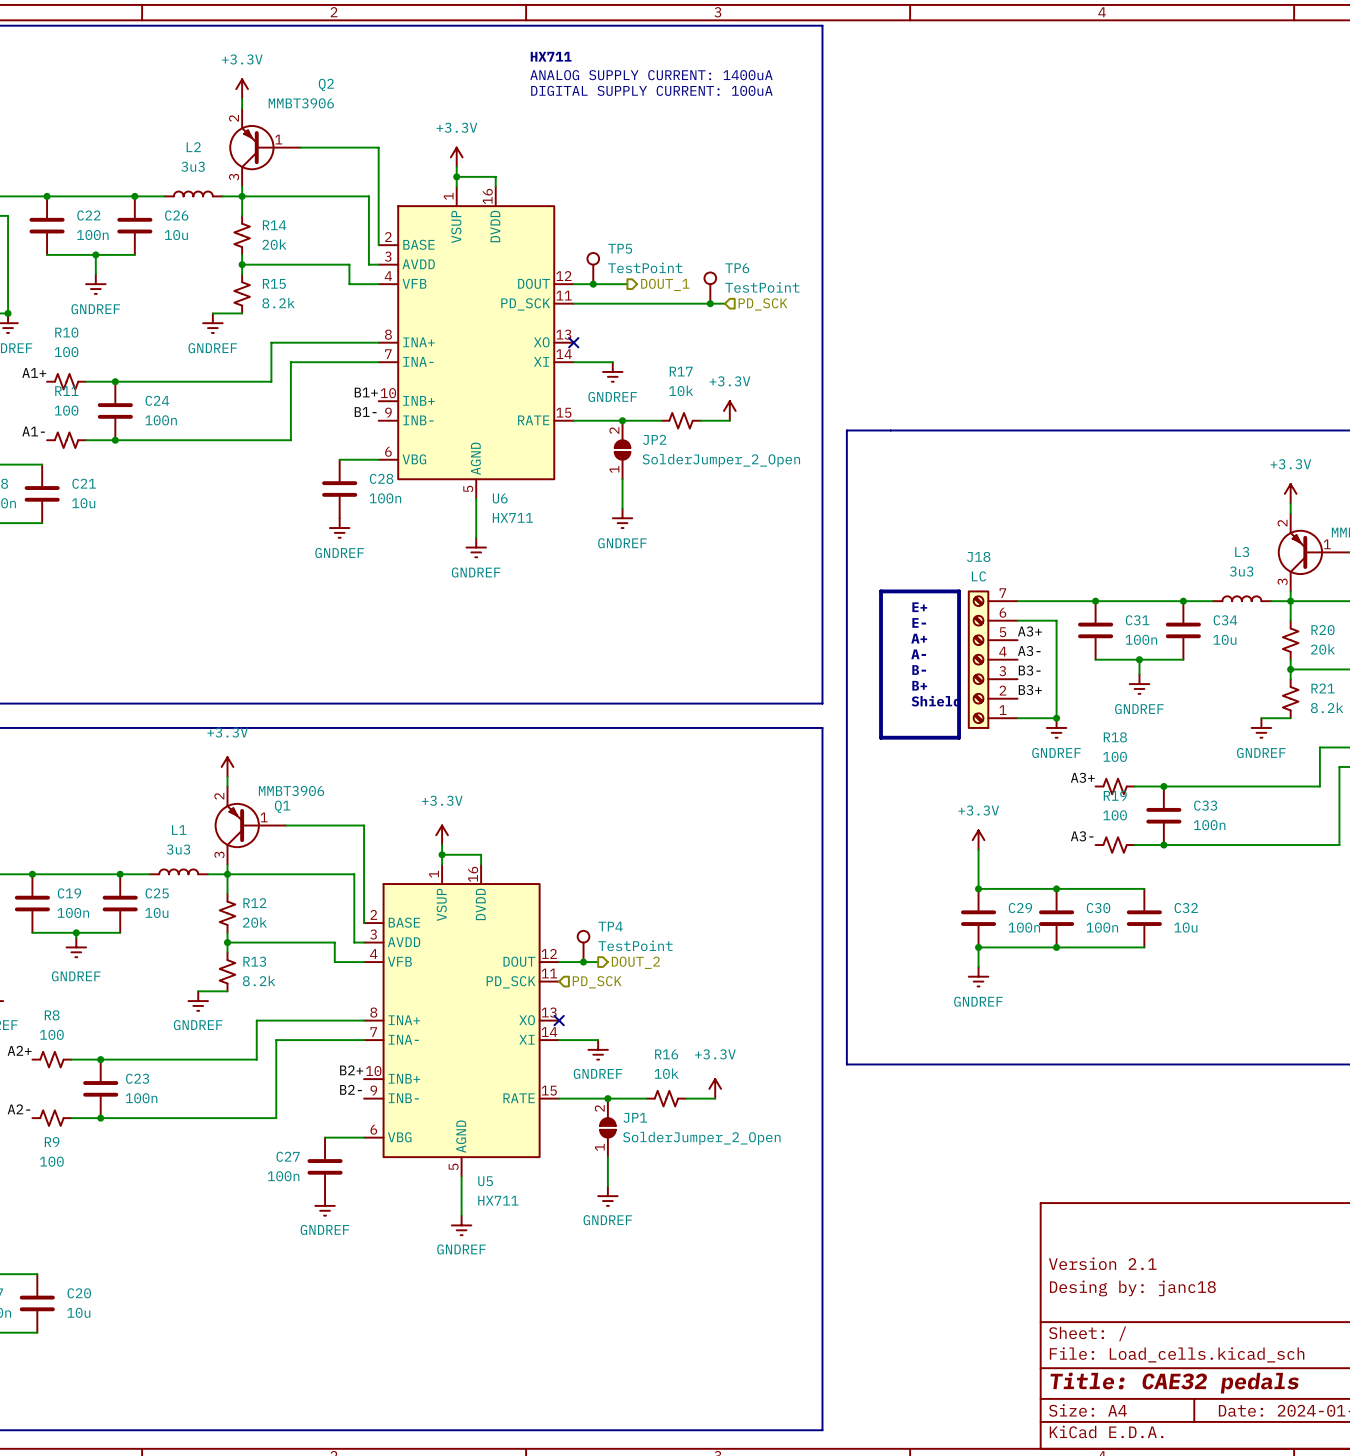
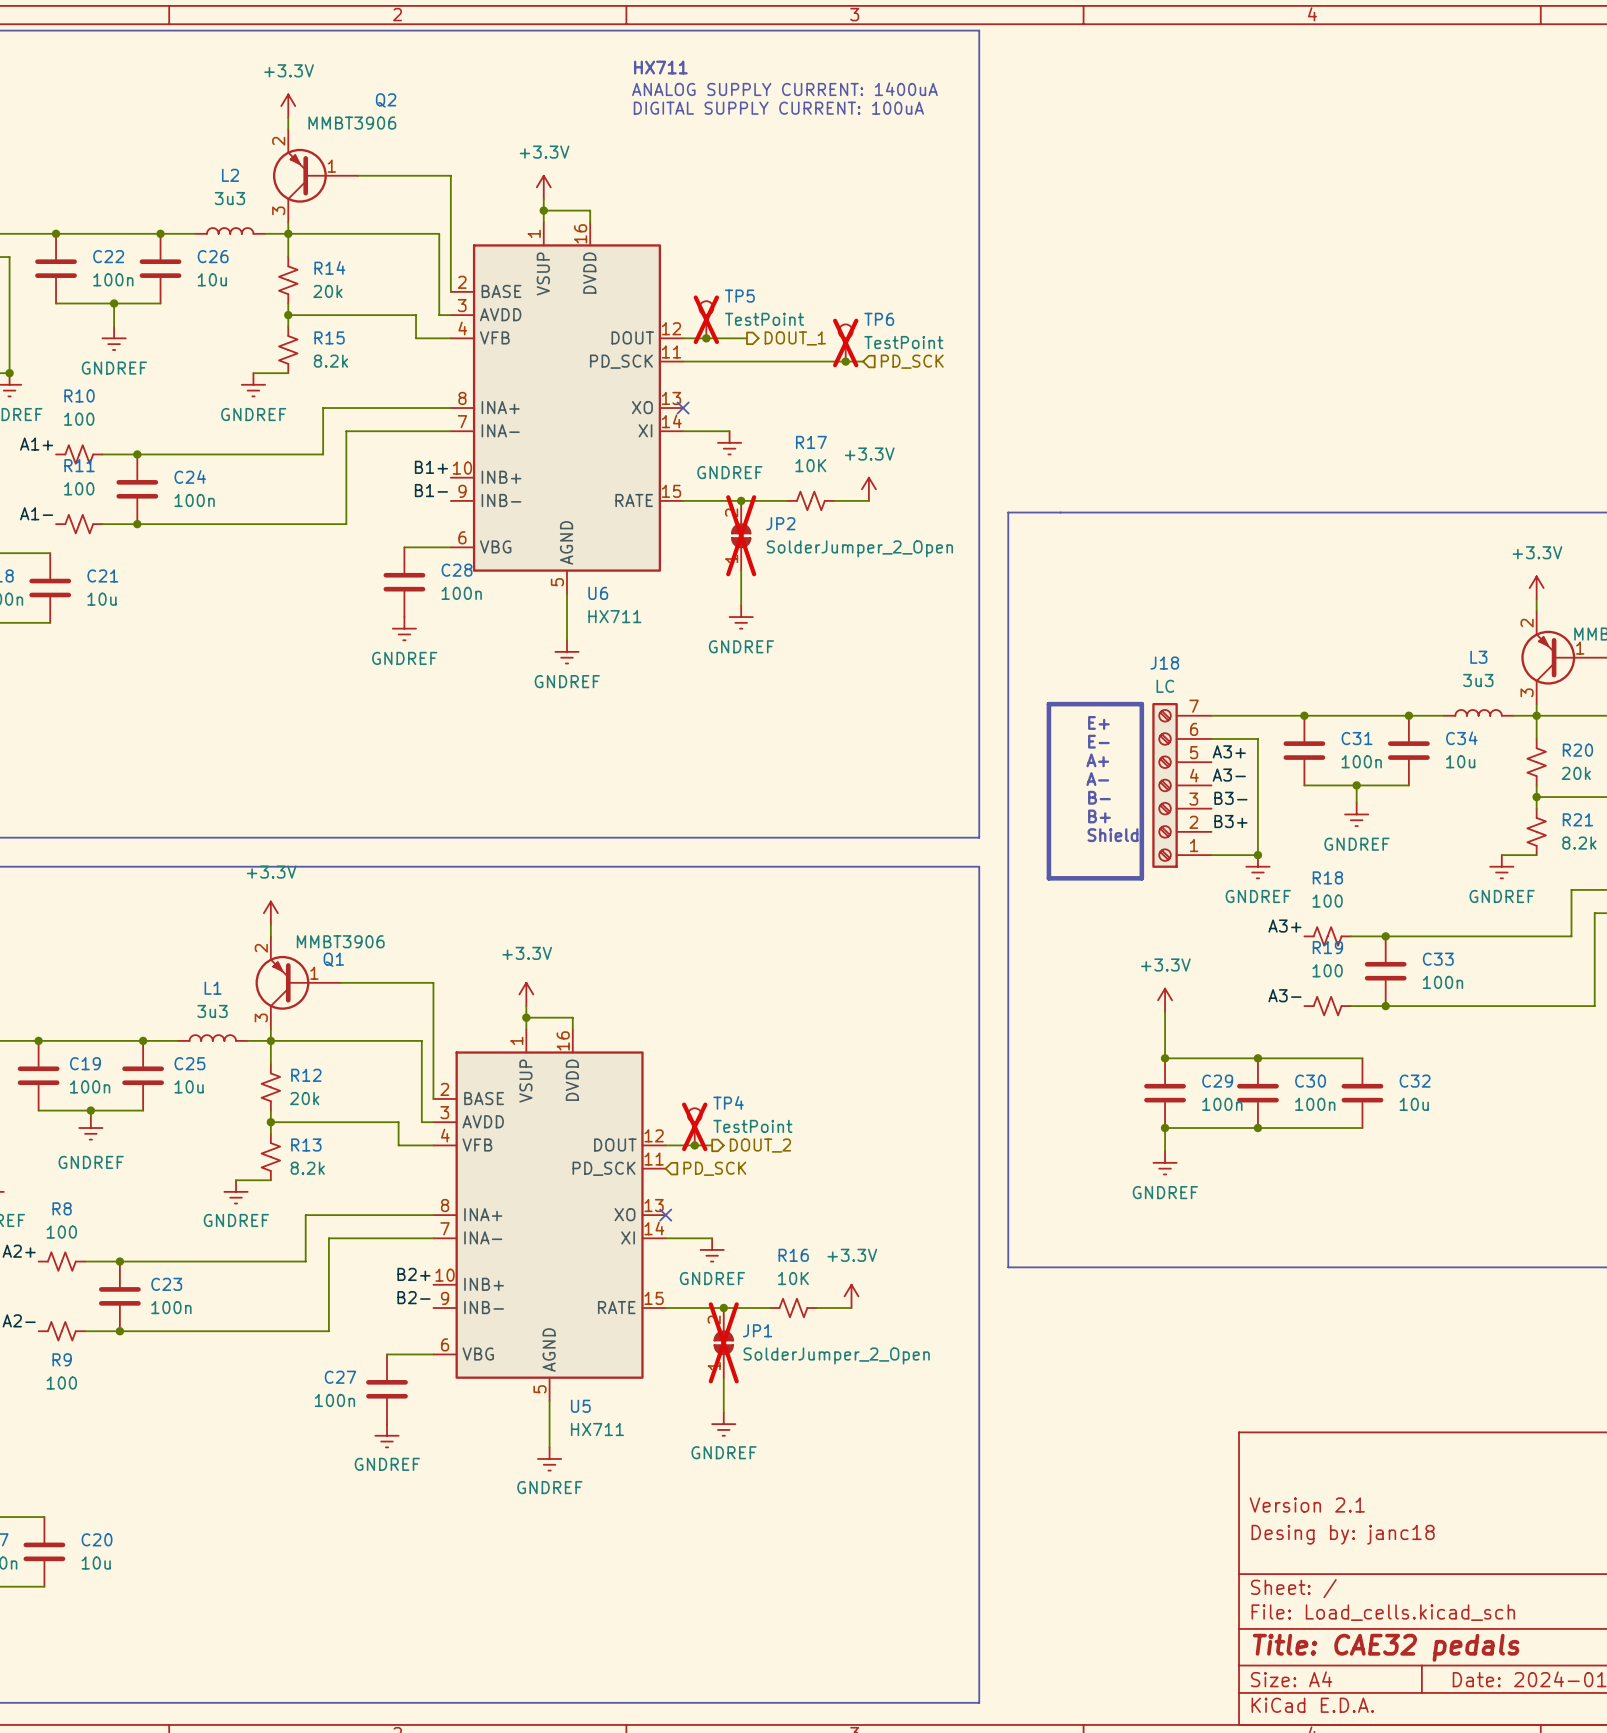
TP5 do-not-place cross: none -> (706, 319)
TP6 do-not-place cross: none -> (845, 342)
R17 value: 10k (681, 390) -> 10K (810, 465)
JP2 do-not-place cross: none -> (741, 535)
TP4 do-not-place cross: none -> (694, 1126)
R16 value: 10k (666, 1073) -> 10K (793, 1278)
JP1 do-not-place cross: none -> (723, 1342)

